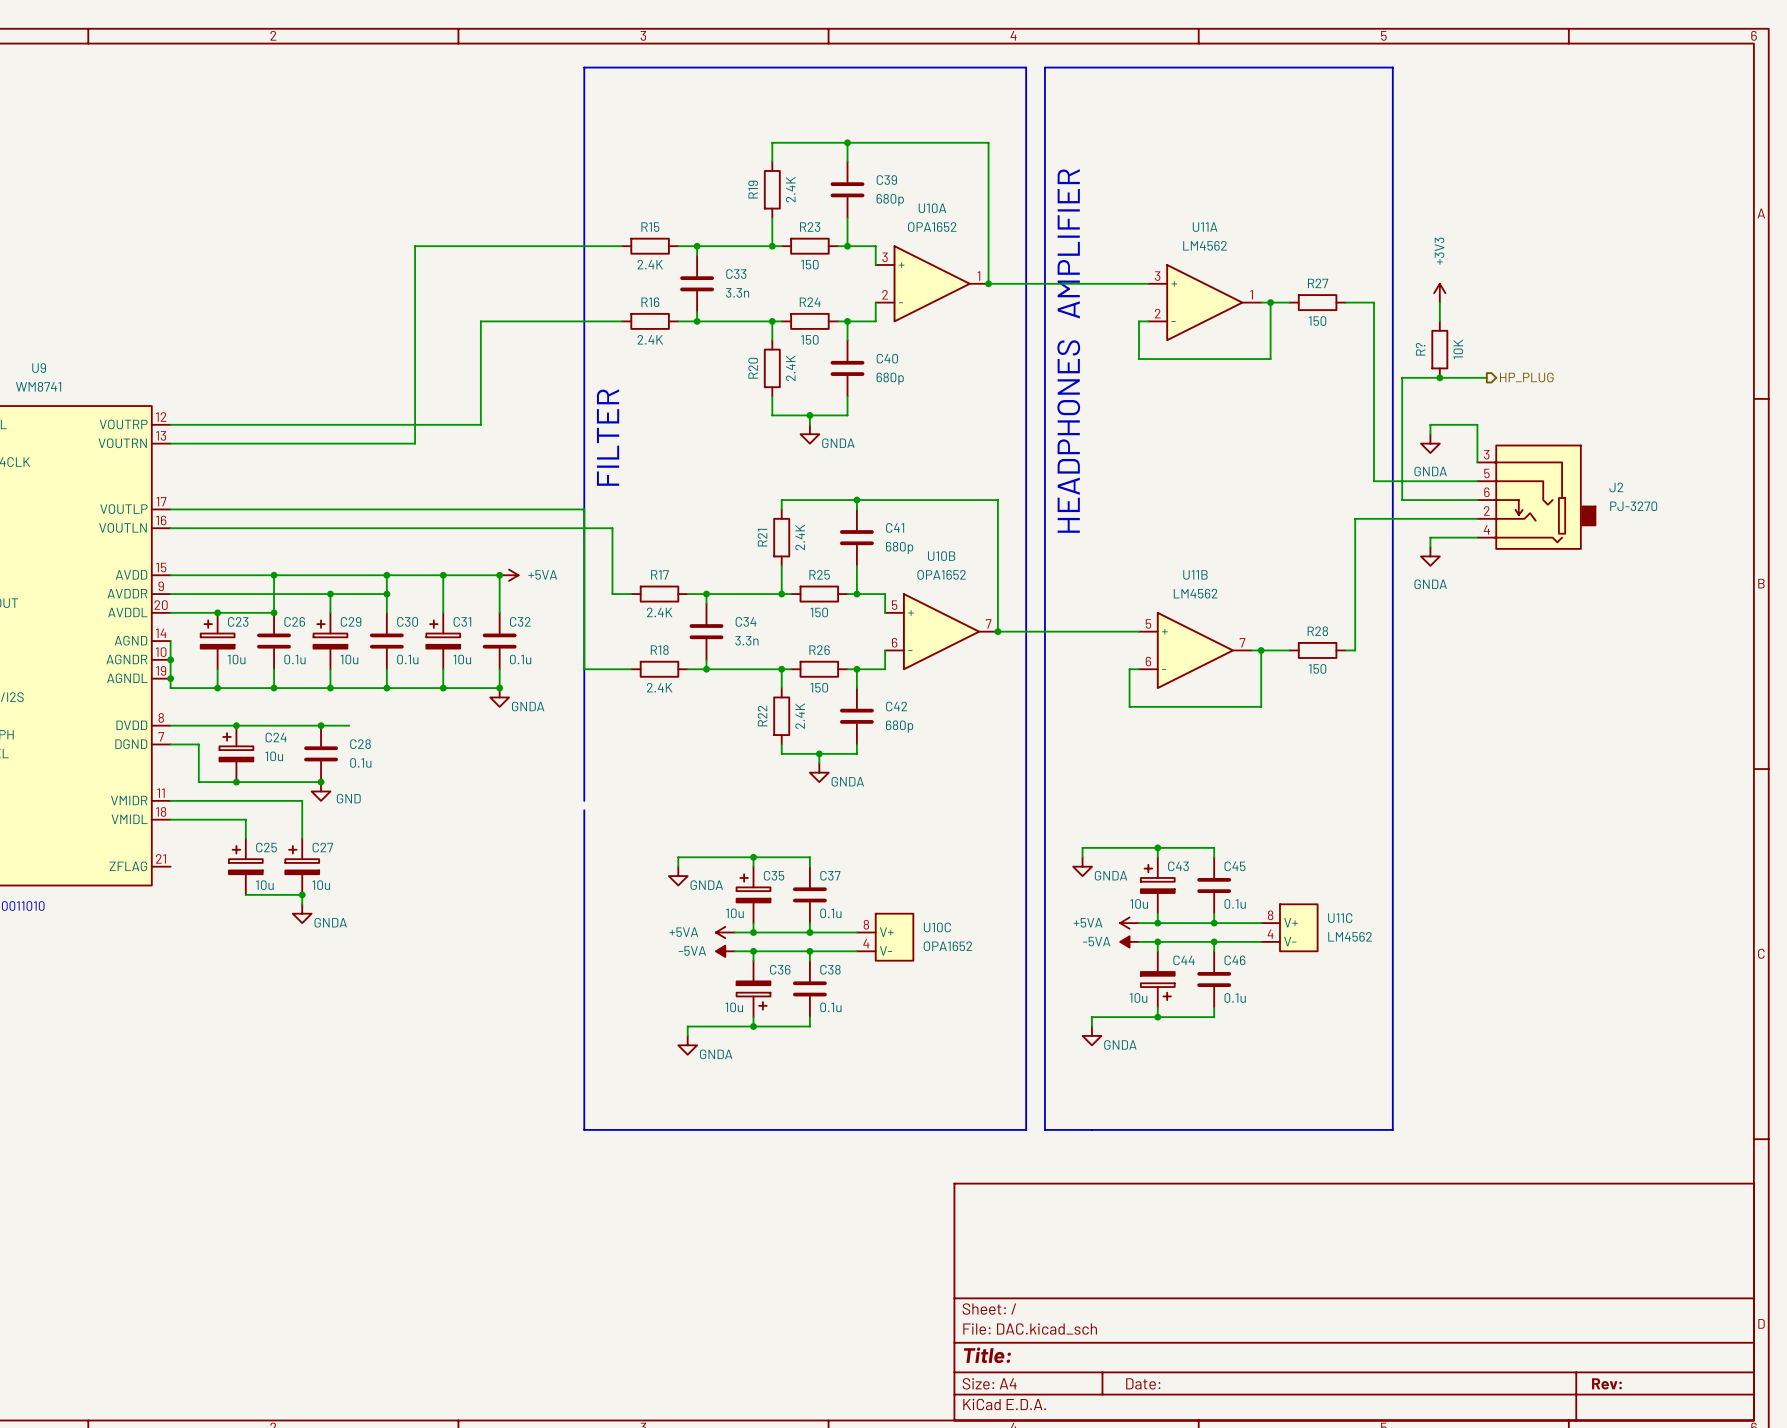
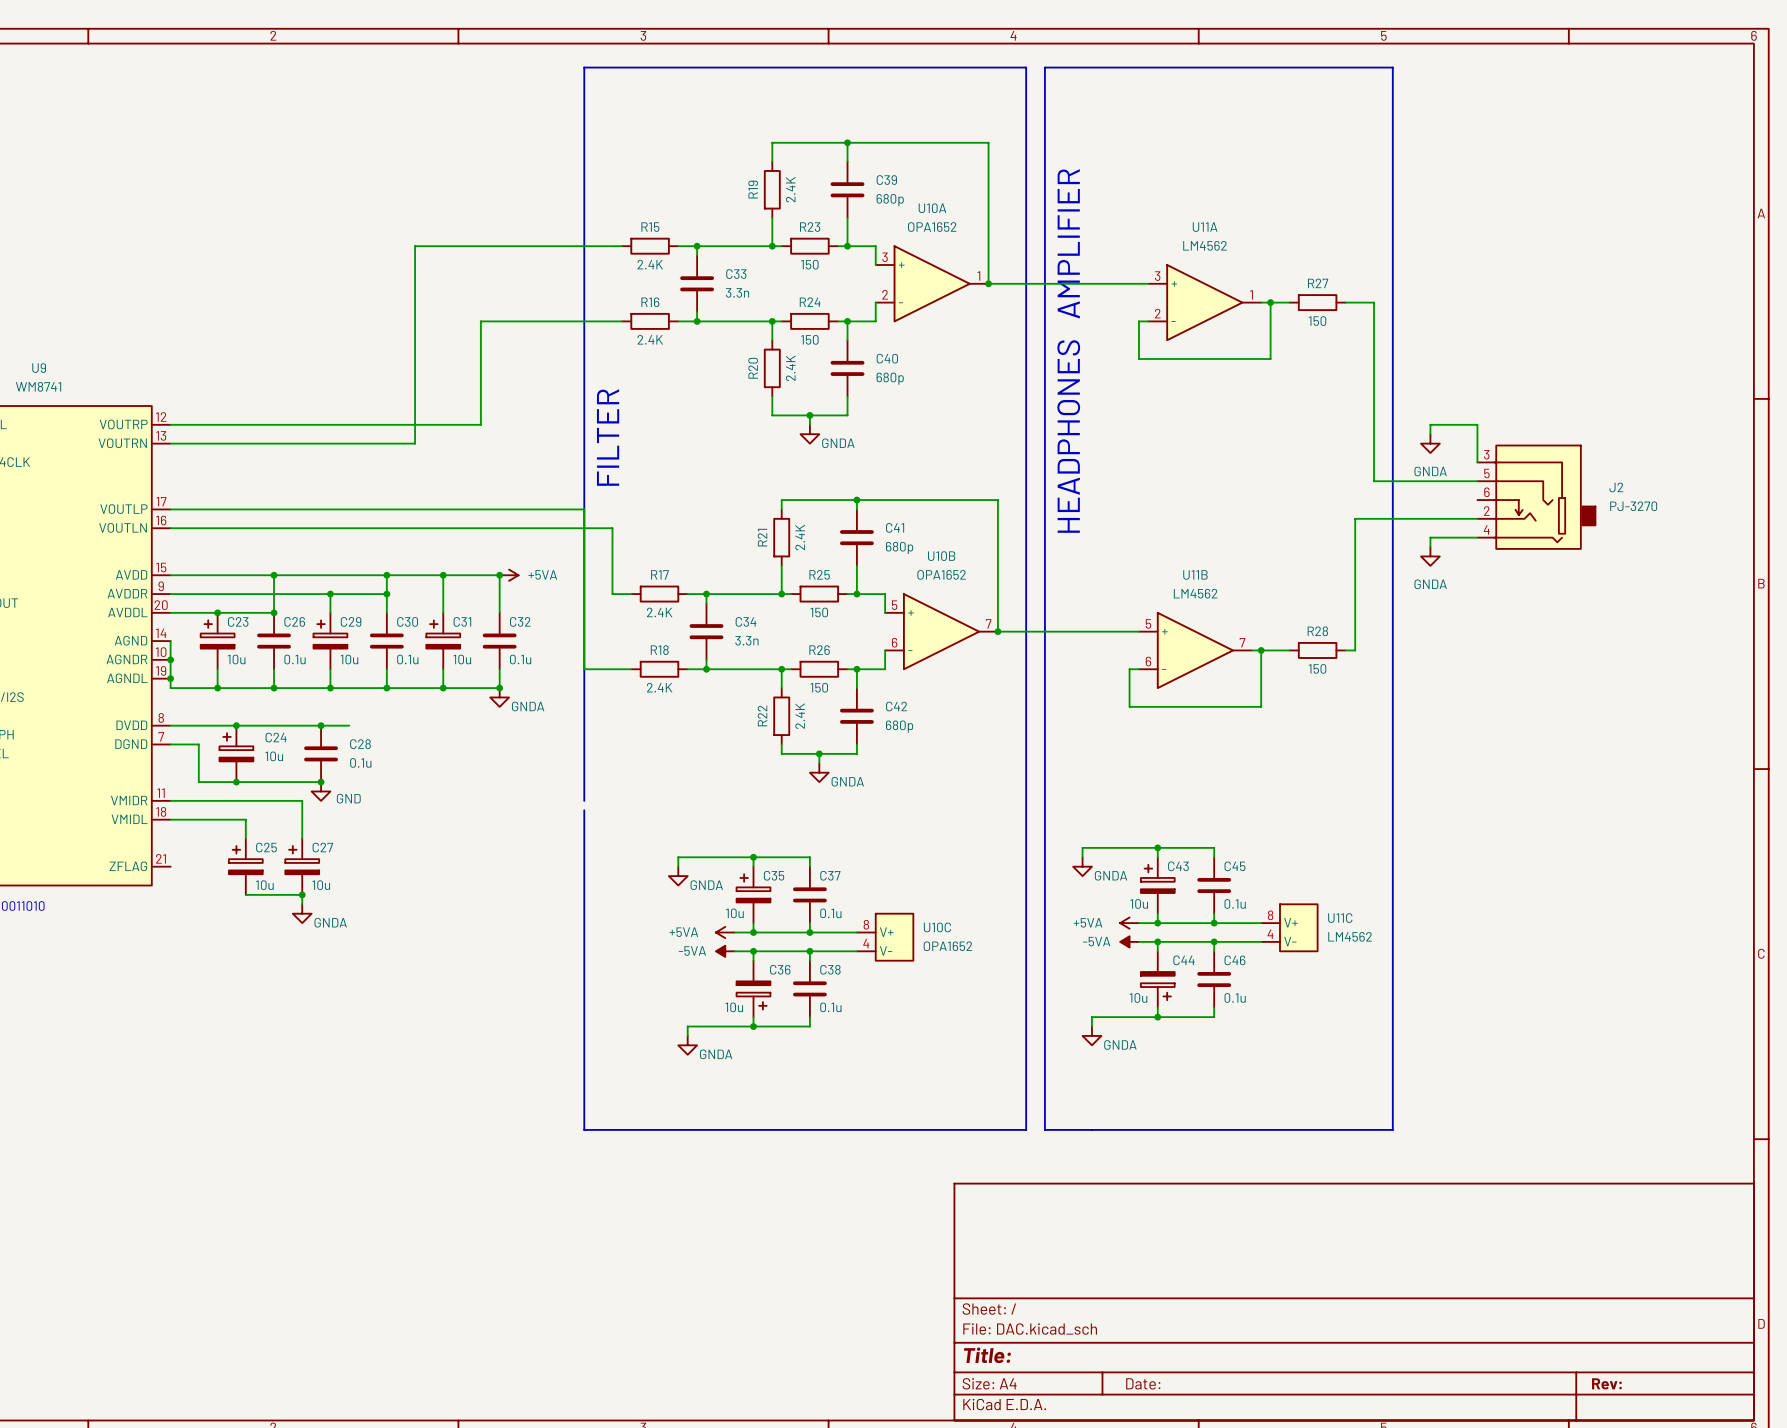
power symbol: +3V3 (1439, 293) -> none
wire: (1439, 302) (1439, 321) -> none
R?: 10K (1439, 349) -> none
junction: (1439, 377) -> none
wire: (1486, 377) (1402, 377) (1402, 500) (1477, 500) -> none
hierarchical label: HP_PLUG (1526, 377) -> none

